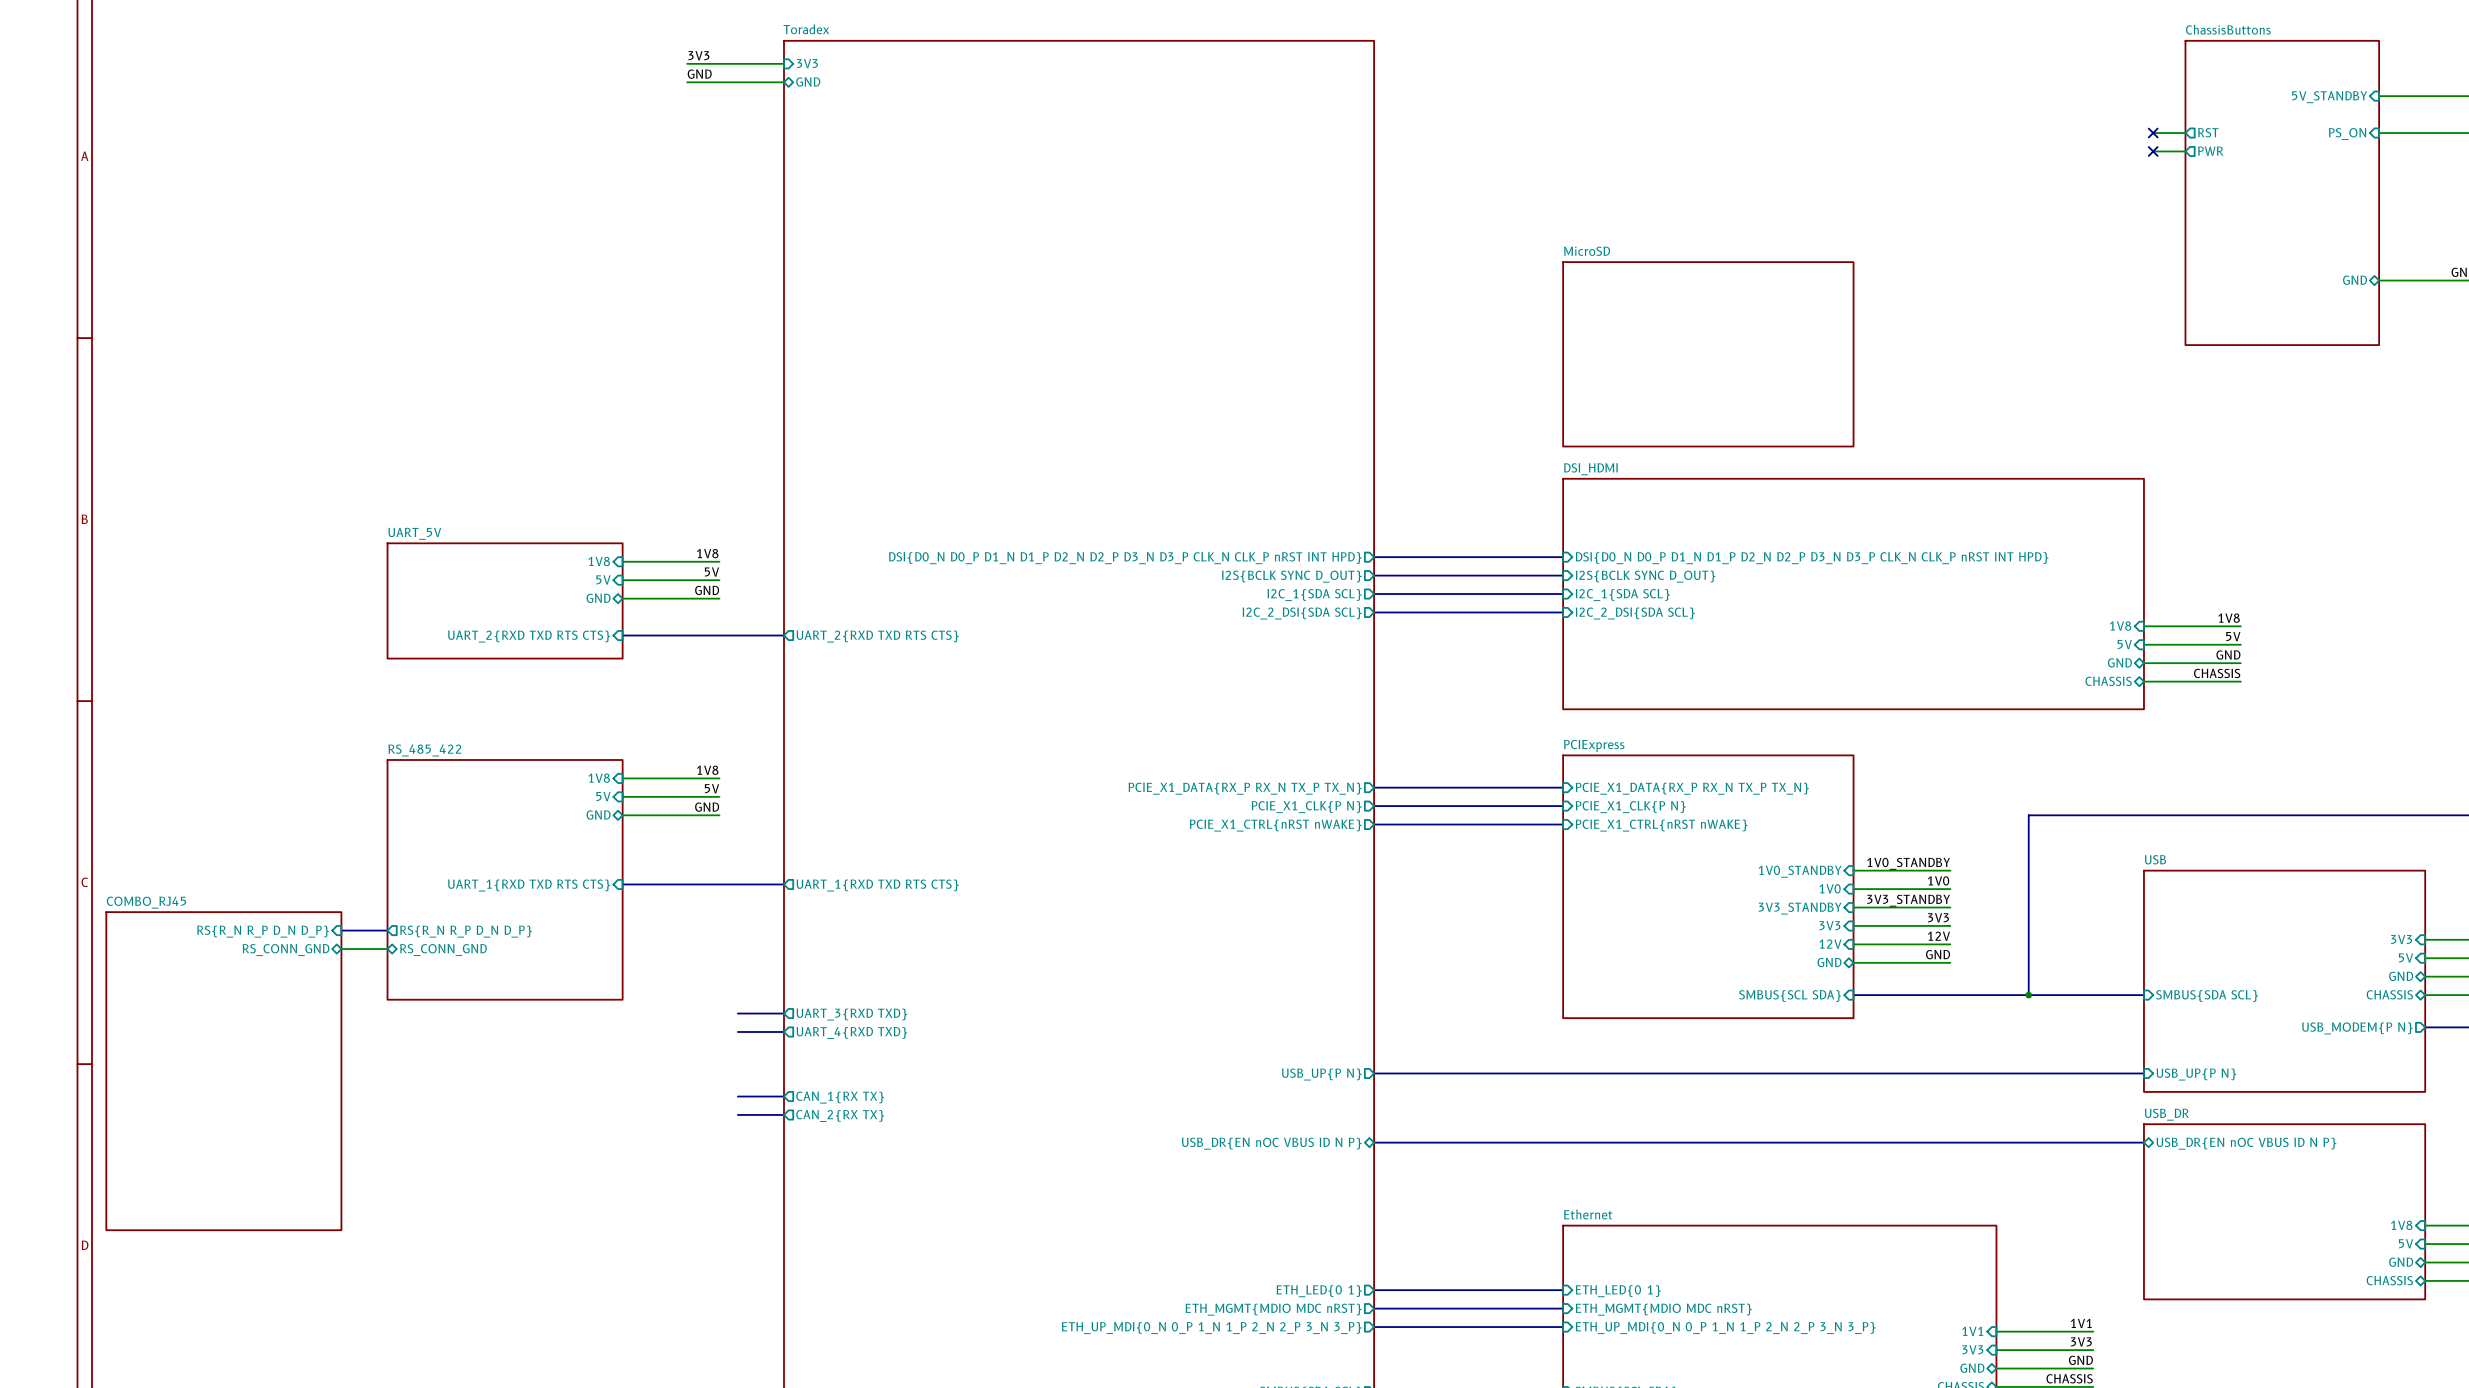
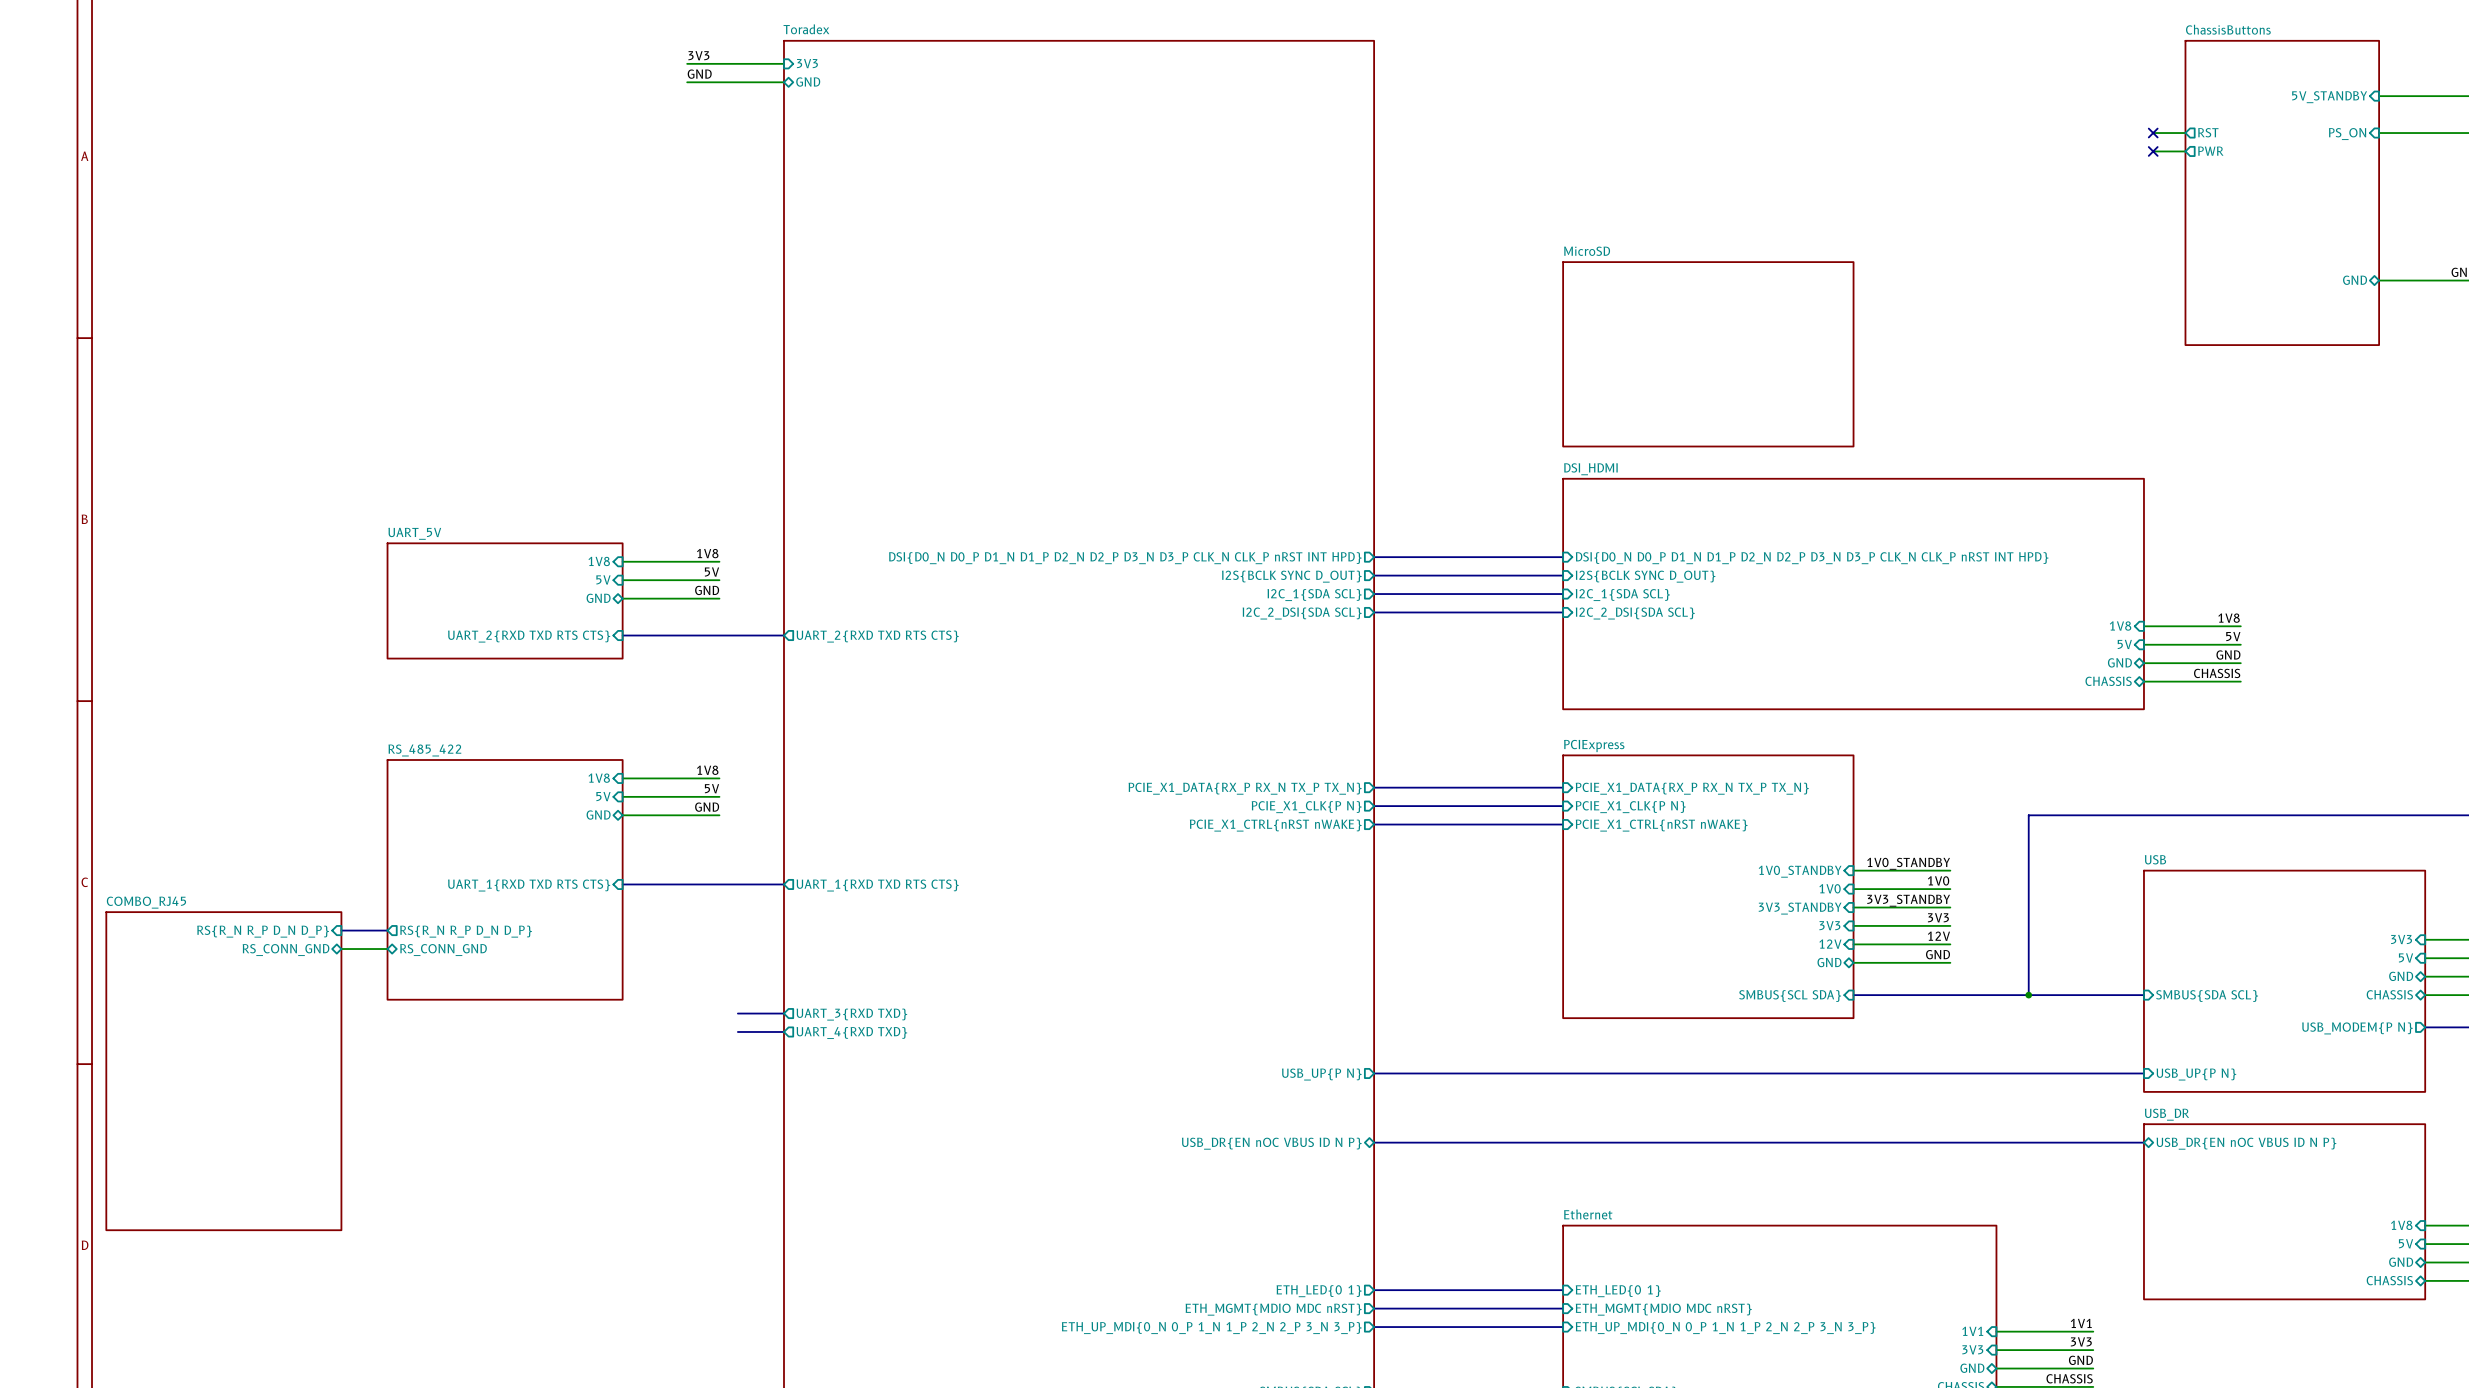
bus: (737, 1096) (783, 1096) -> none
sheet pin: CAN_1{RX TX} (840, 1097) -> none
bus: (737, 1114) (783, 1114) -> none
sheet pin: CAN_2{RX TX} (840, 1116) -> none

